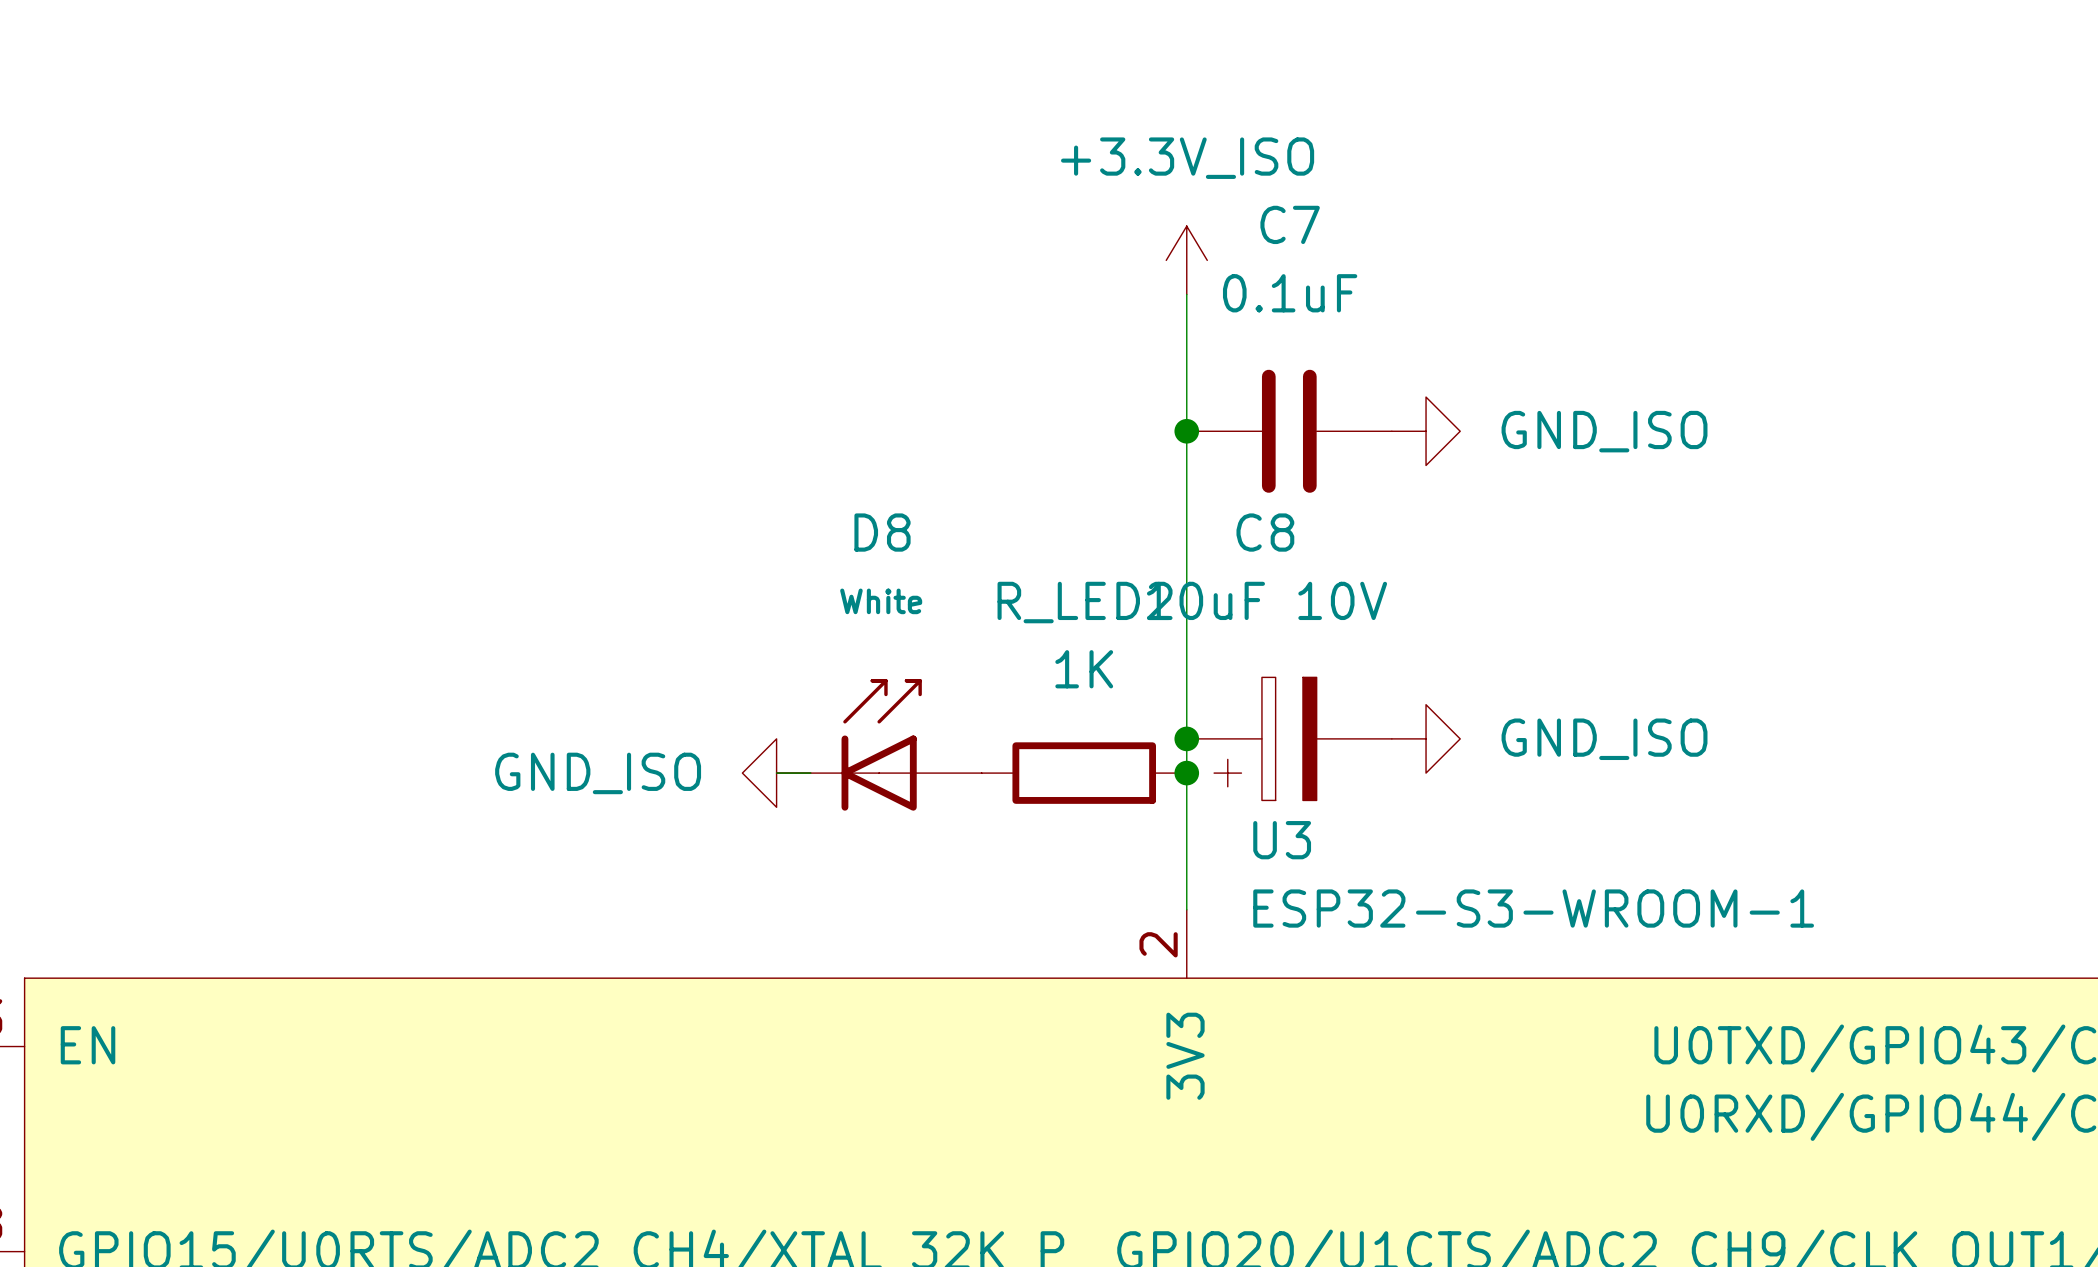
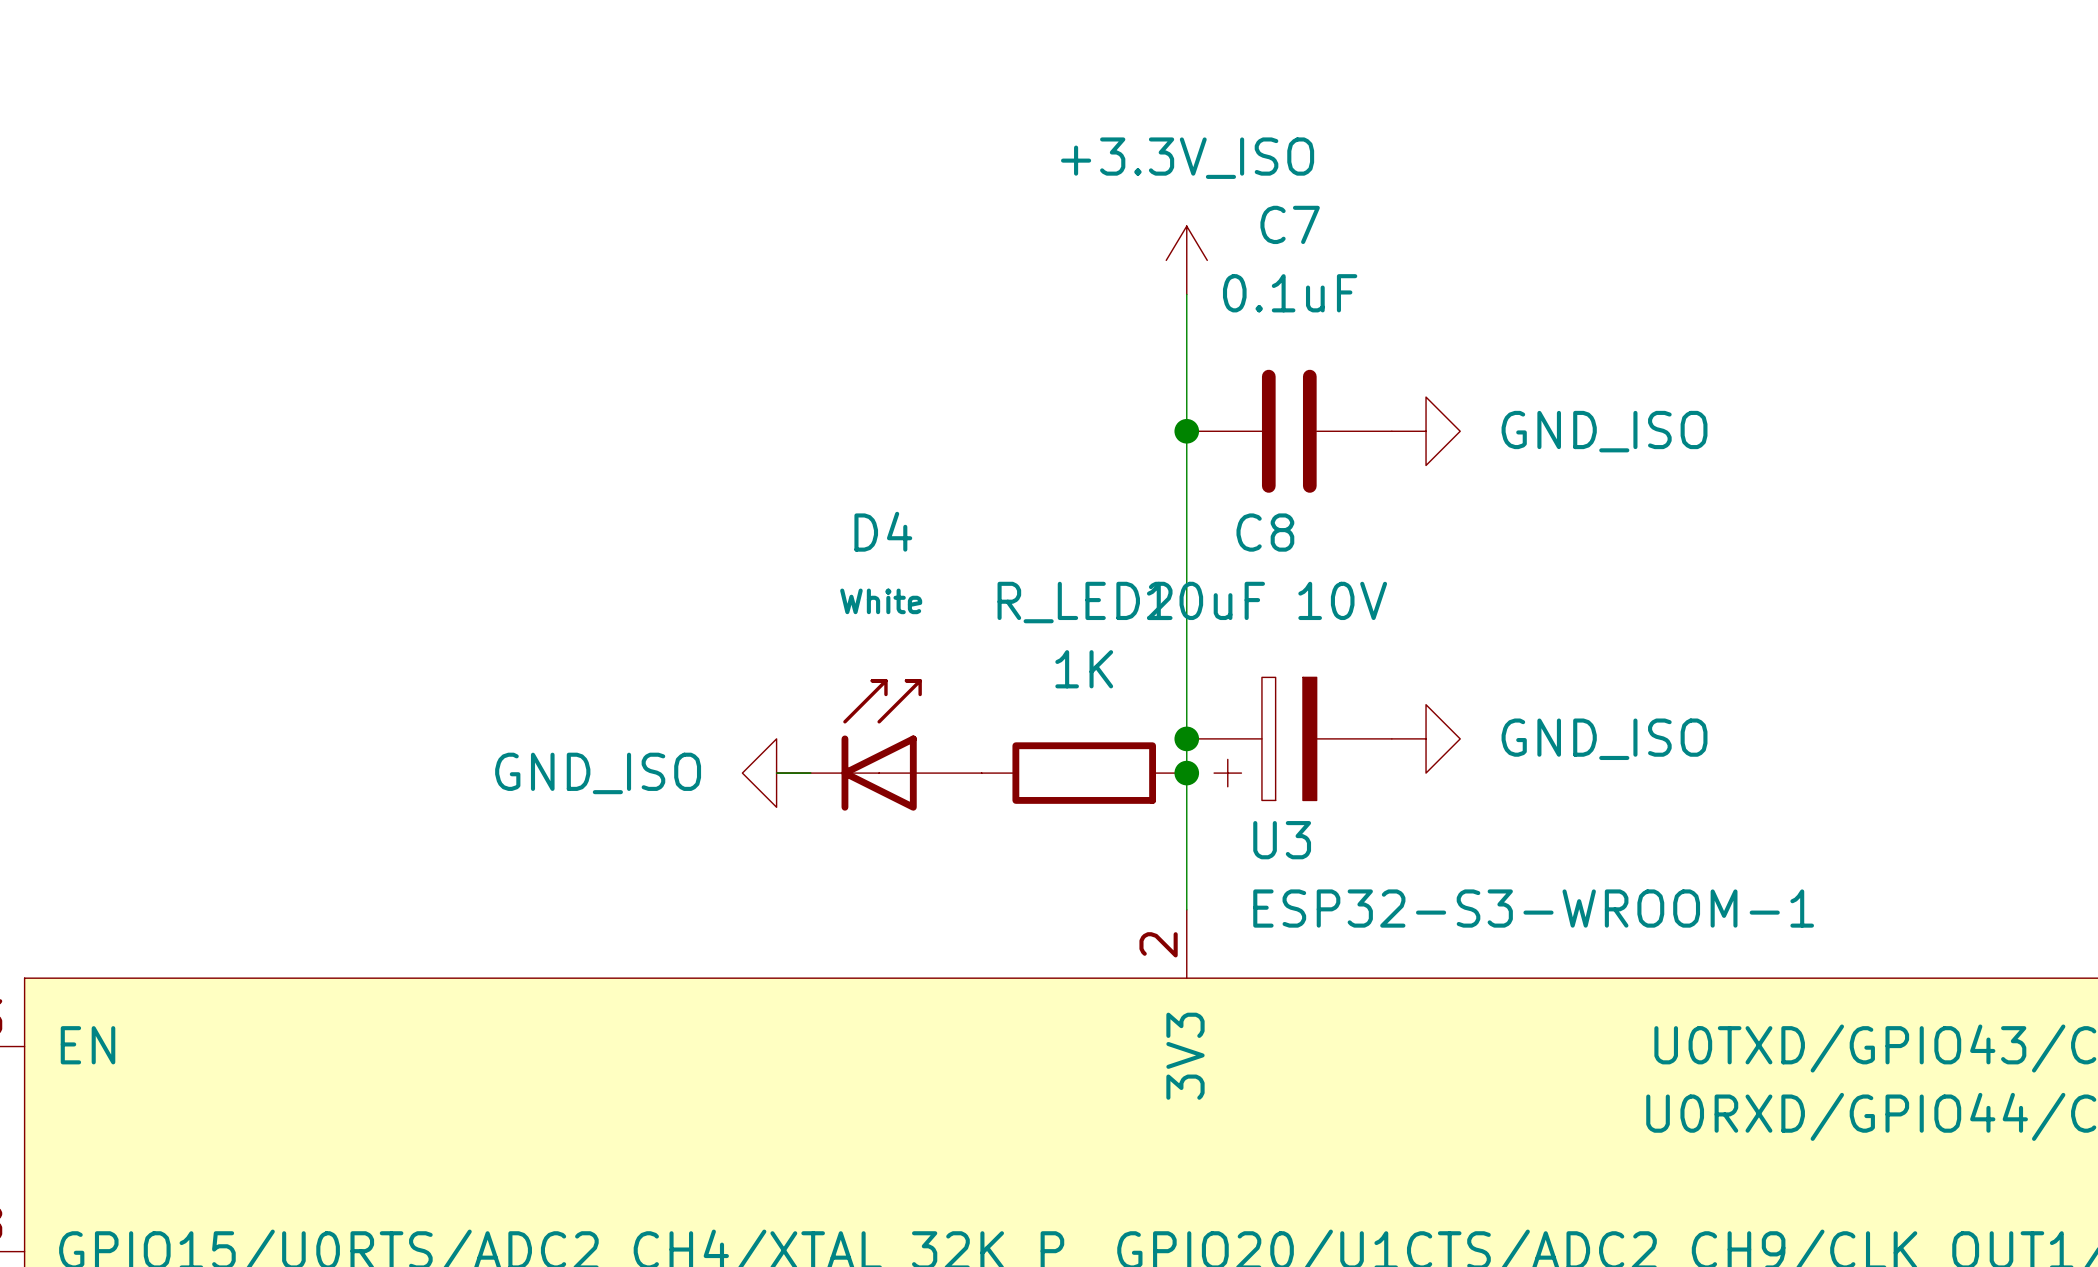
D8 name: D8 (882, 532) -> D4 (883, 531)

